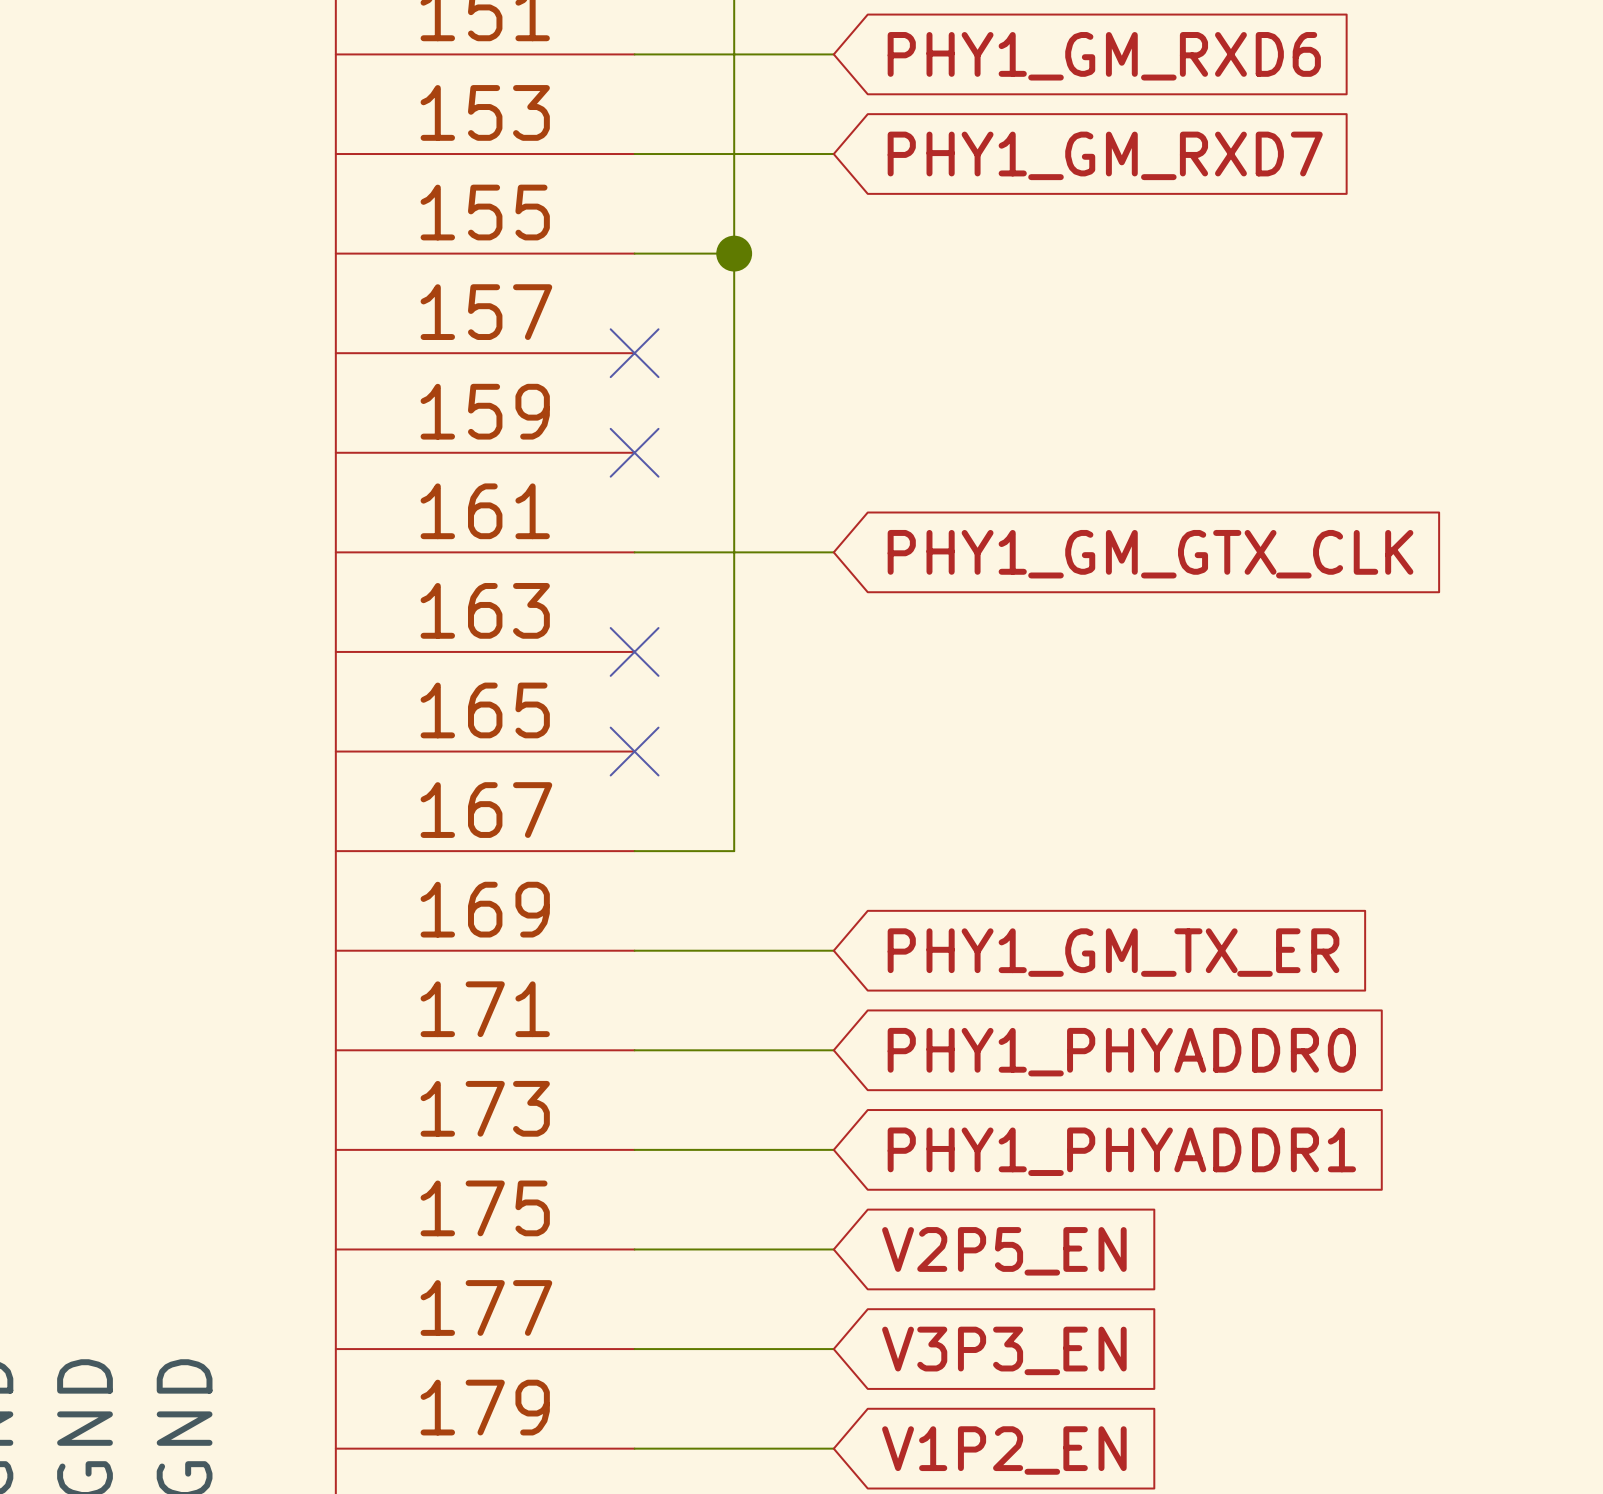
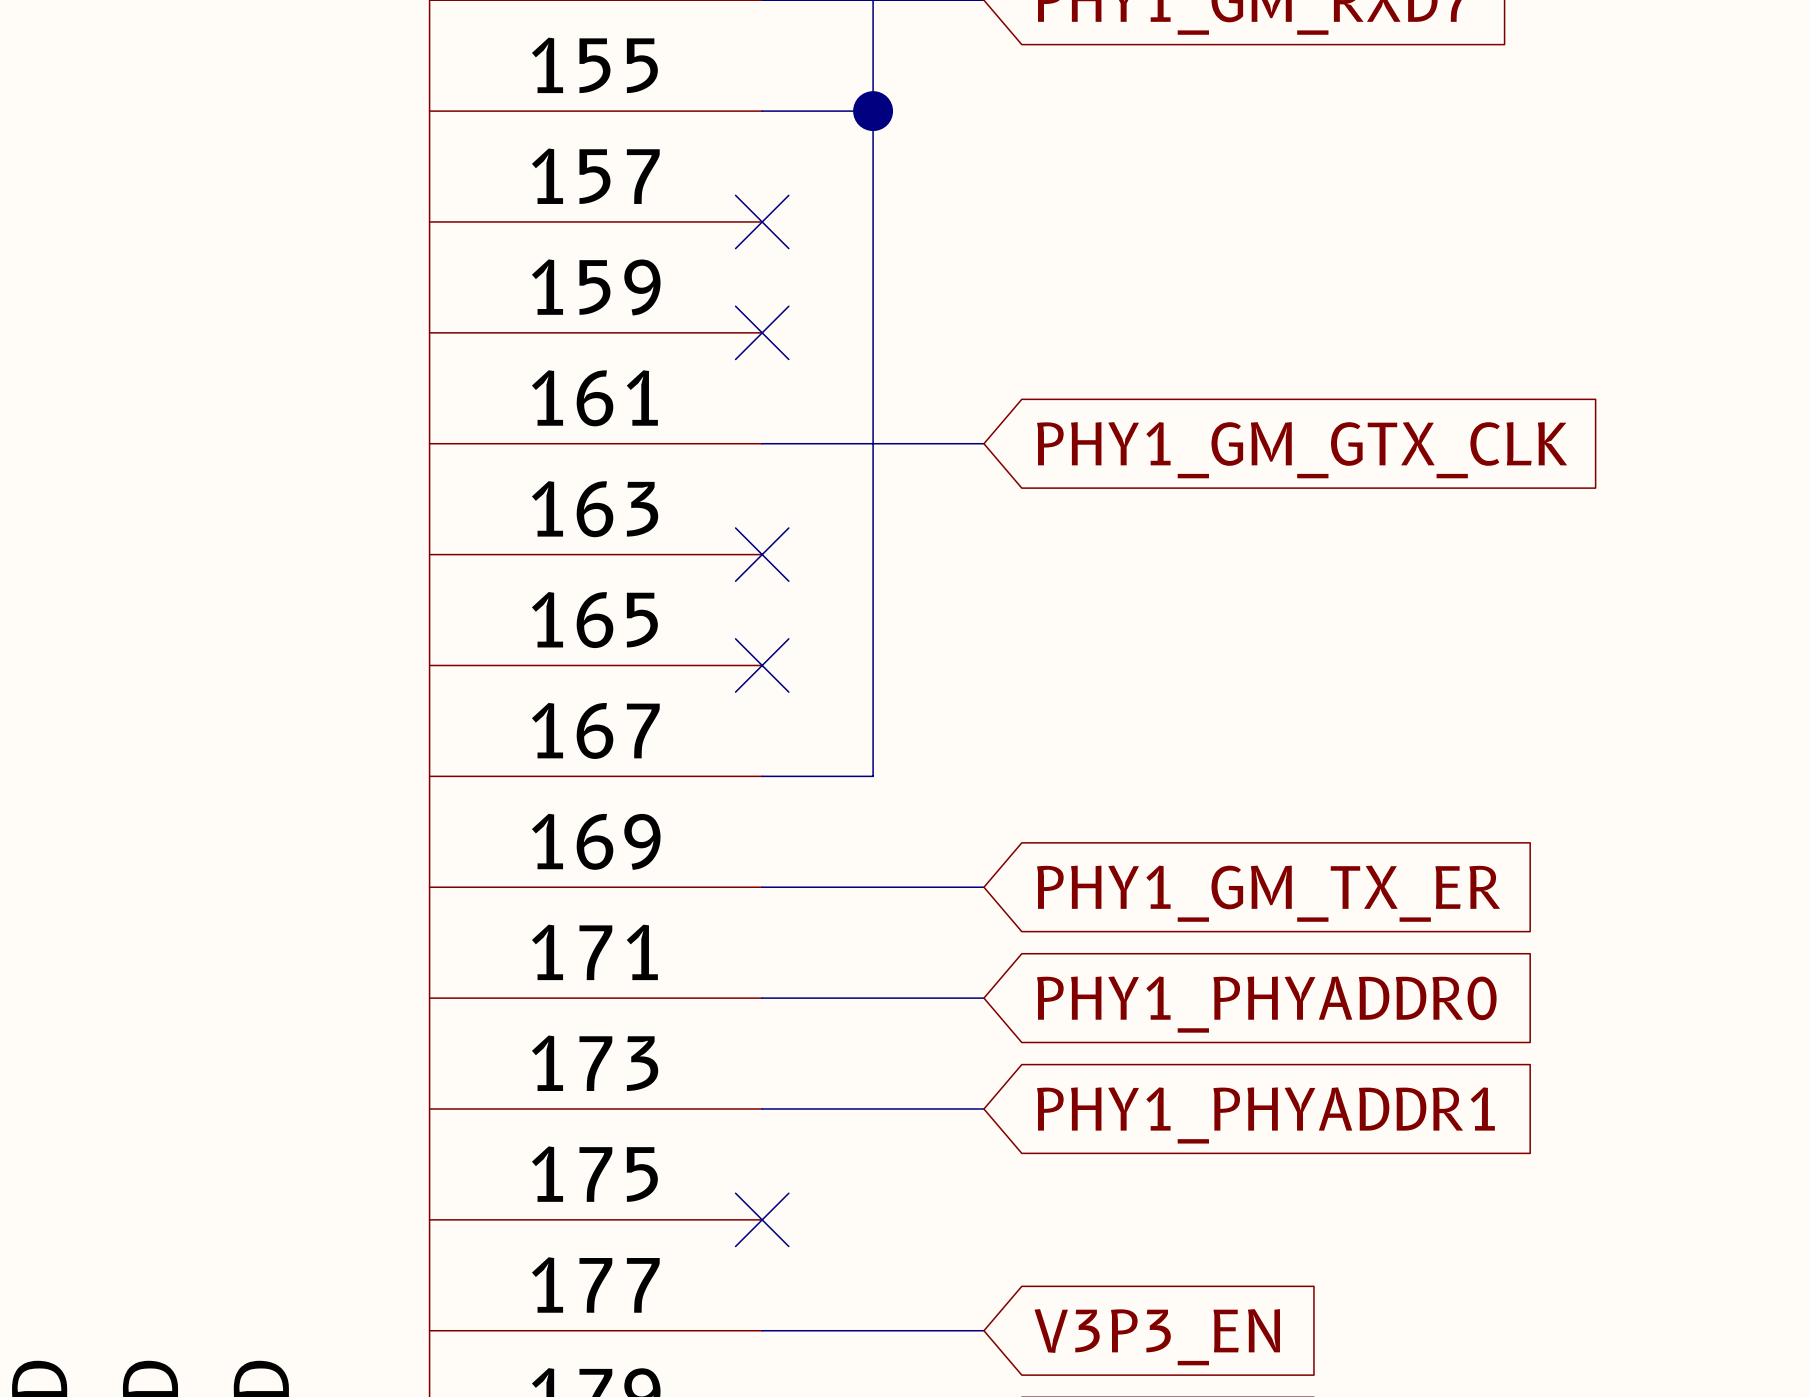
wire: (634, 1249) (833, 1249) -> none
no-connect mark: none -> (762, 1219)
global label: V2P5_EN (1004, 1251) -> none

